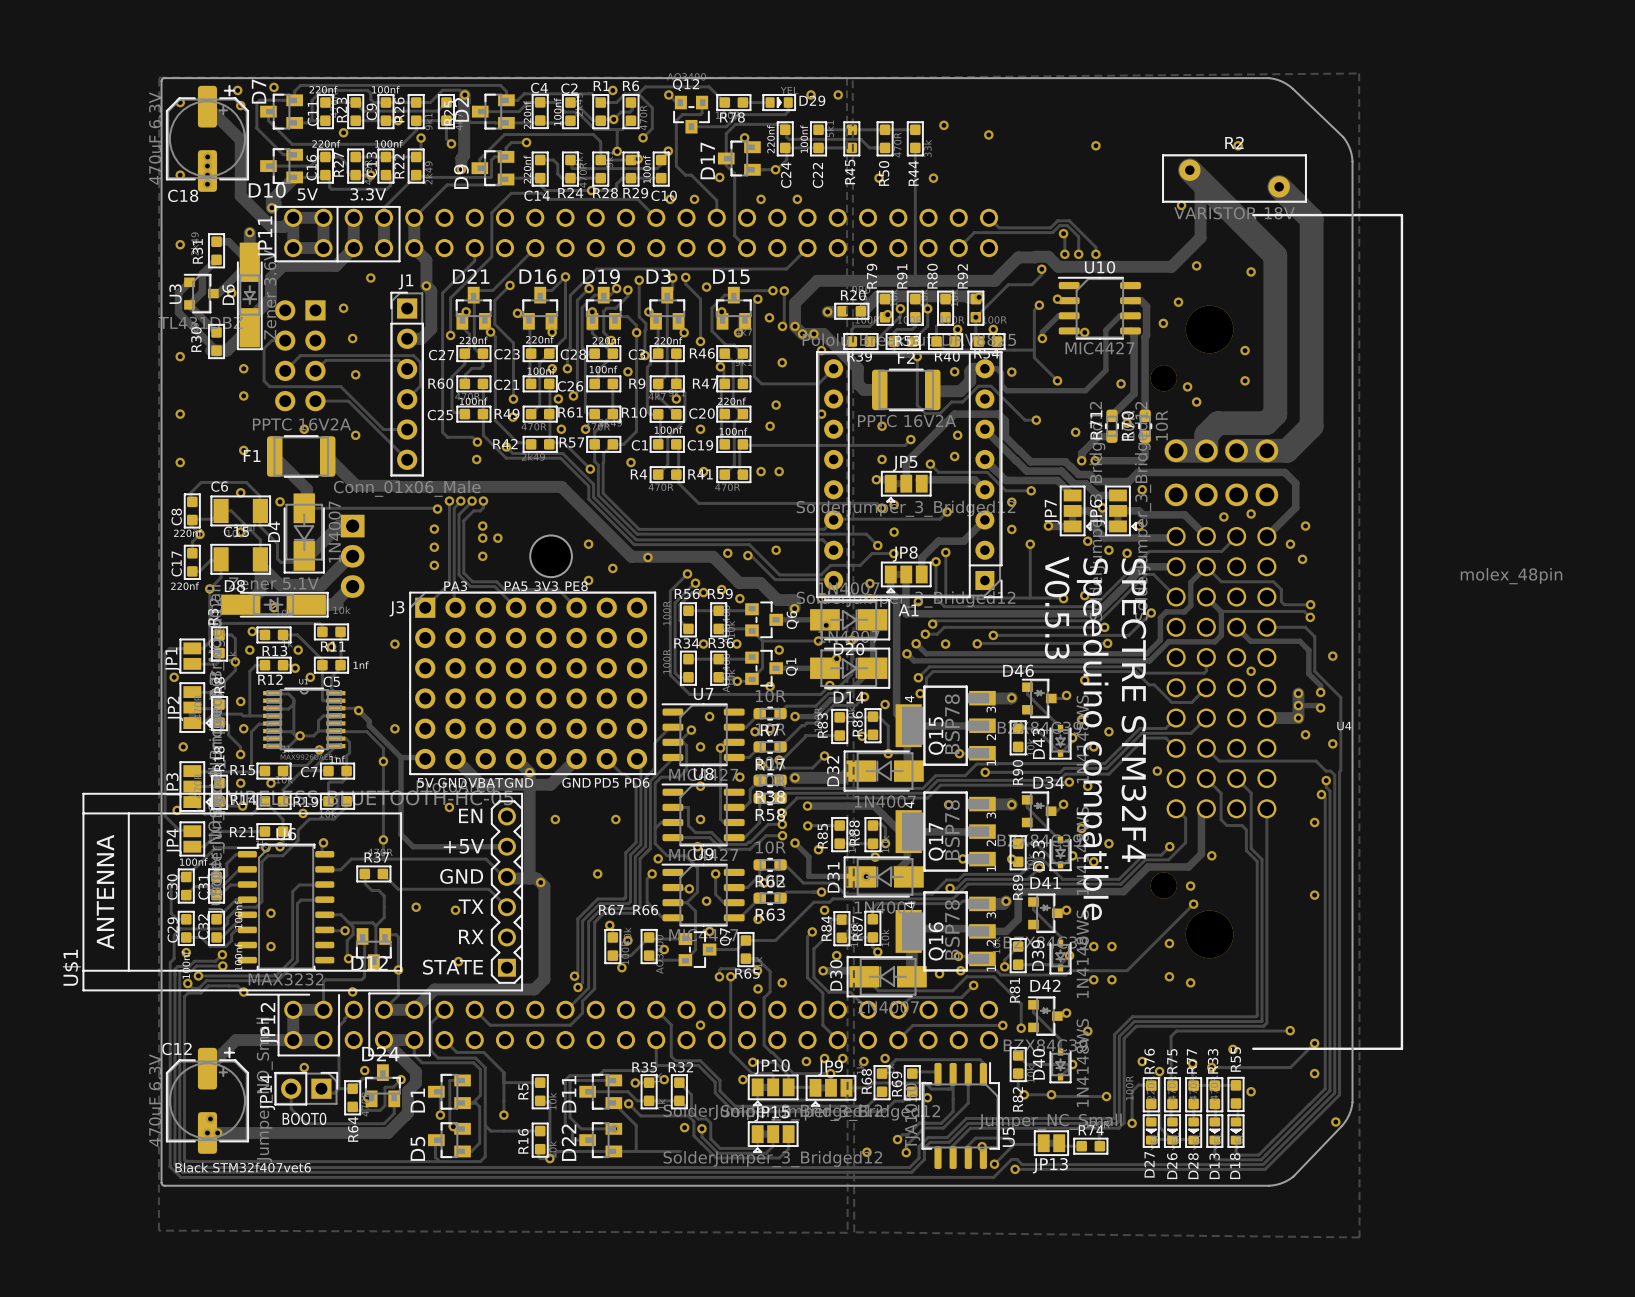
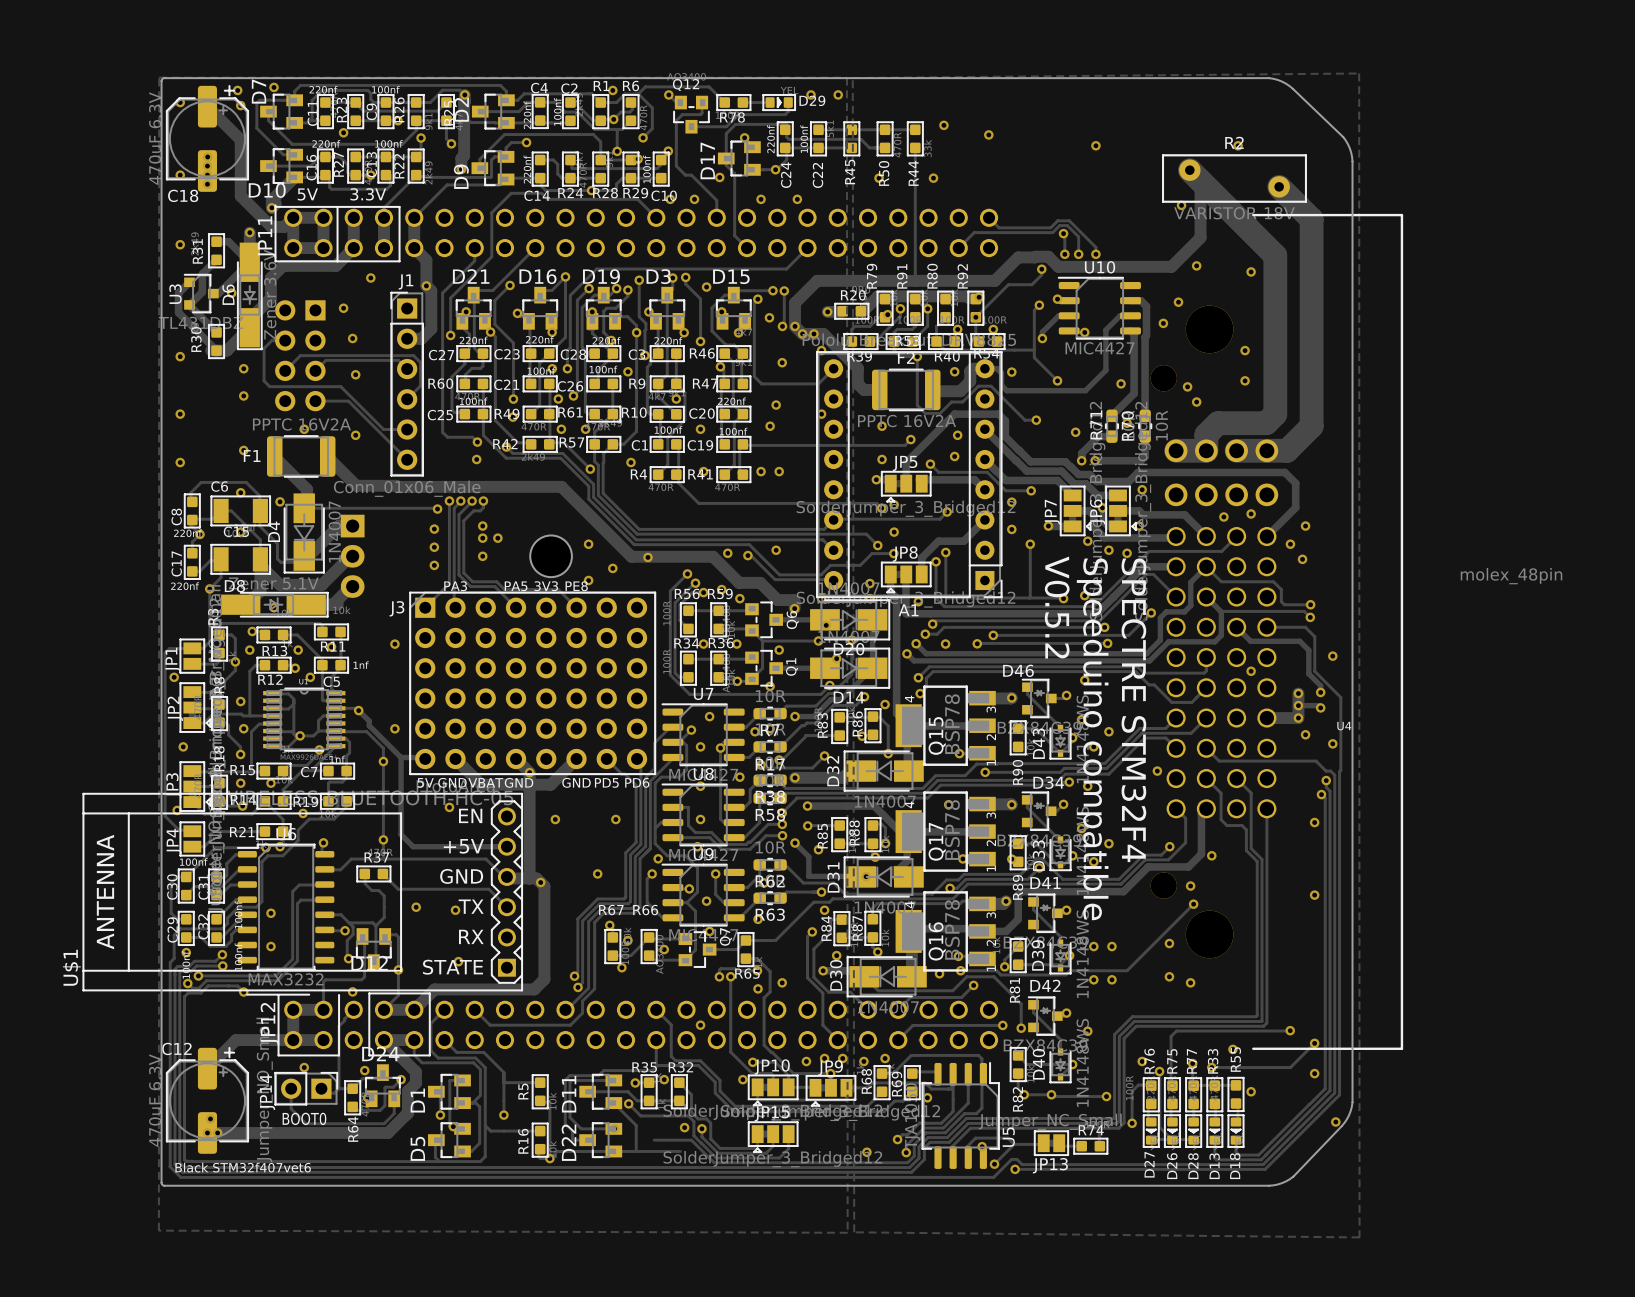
text: V0.5.3 (1057, 607) -> V0.5.2 (1057, 607)
track: (882, 1073) (895, 1059) (980, 1059) (983, 1062) (983, 1074) -> (882, 1073) (893, 1073) (911, 1055) (978, 1055) (981, 1058) (981, 1108) (976, 1113) (964, 1113) (945, 1132) (926, 1132) (914, 1144) (914, 1156) (907, 1162) (714, 1162) (709, 1157)
track: none -> (654, 1140) (691, 1140) (709, 1157)

